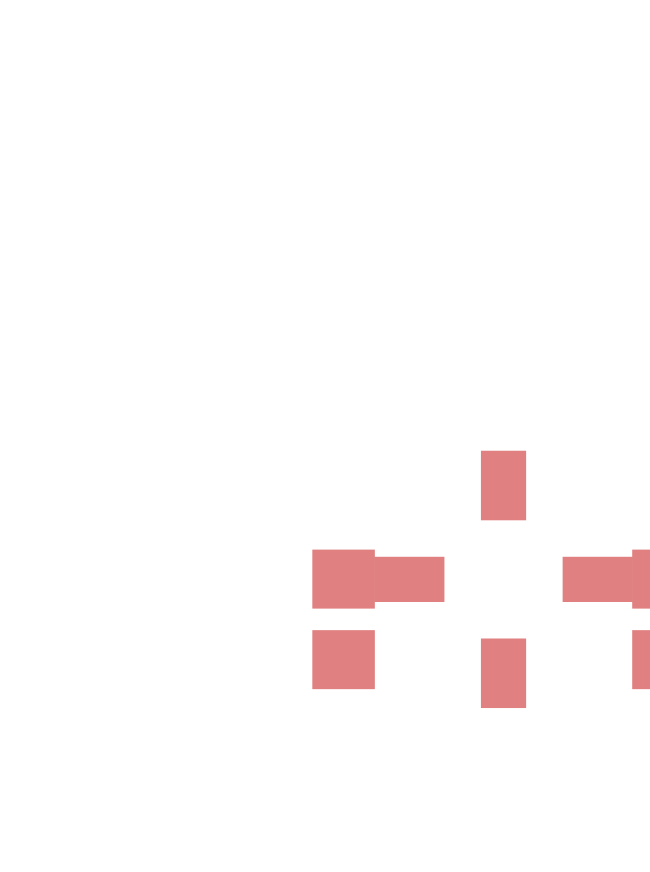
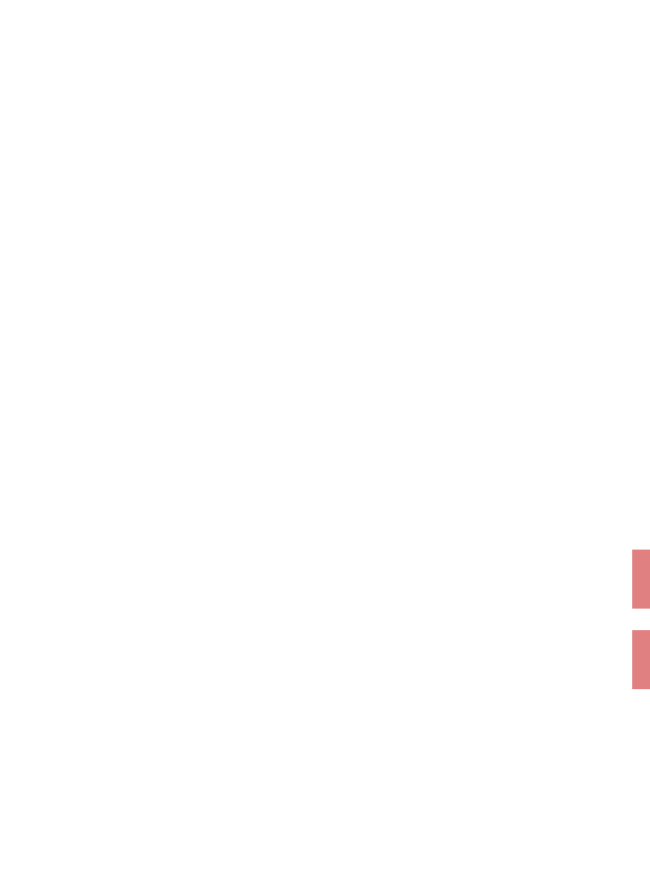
part: (503, 579) -> none
part: (343, 619) -> none

